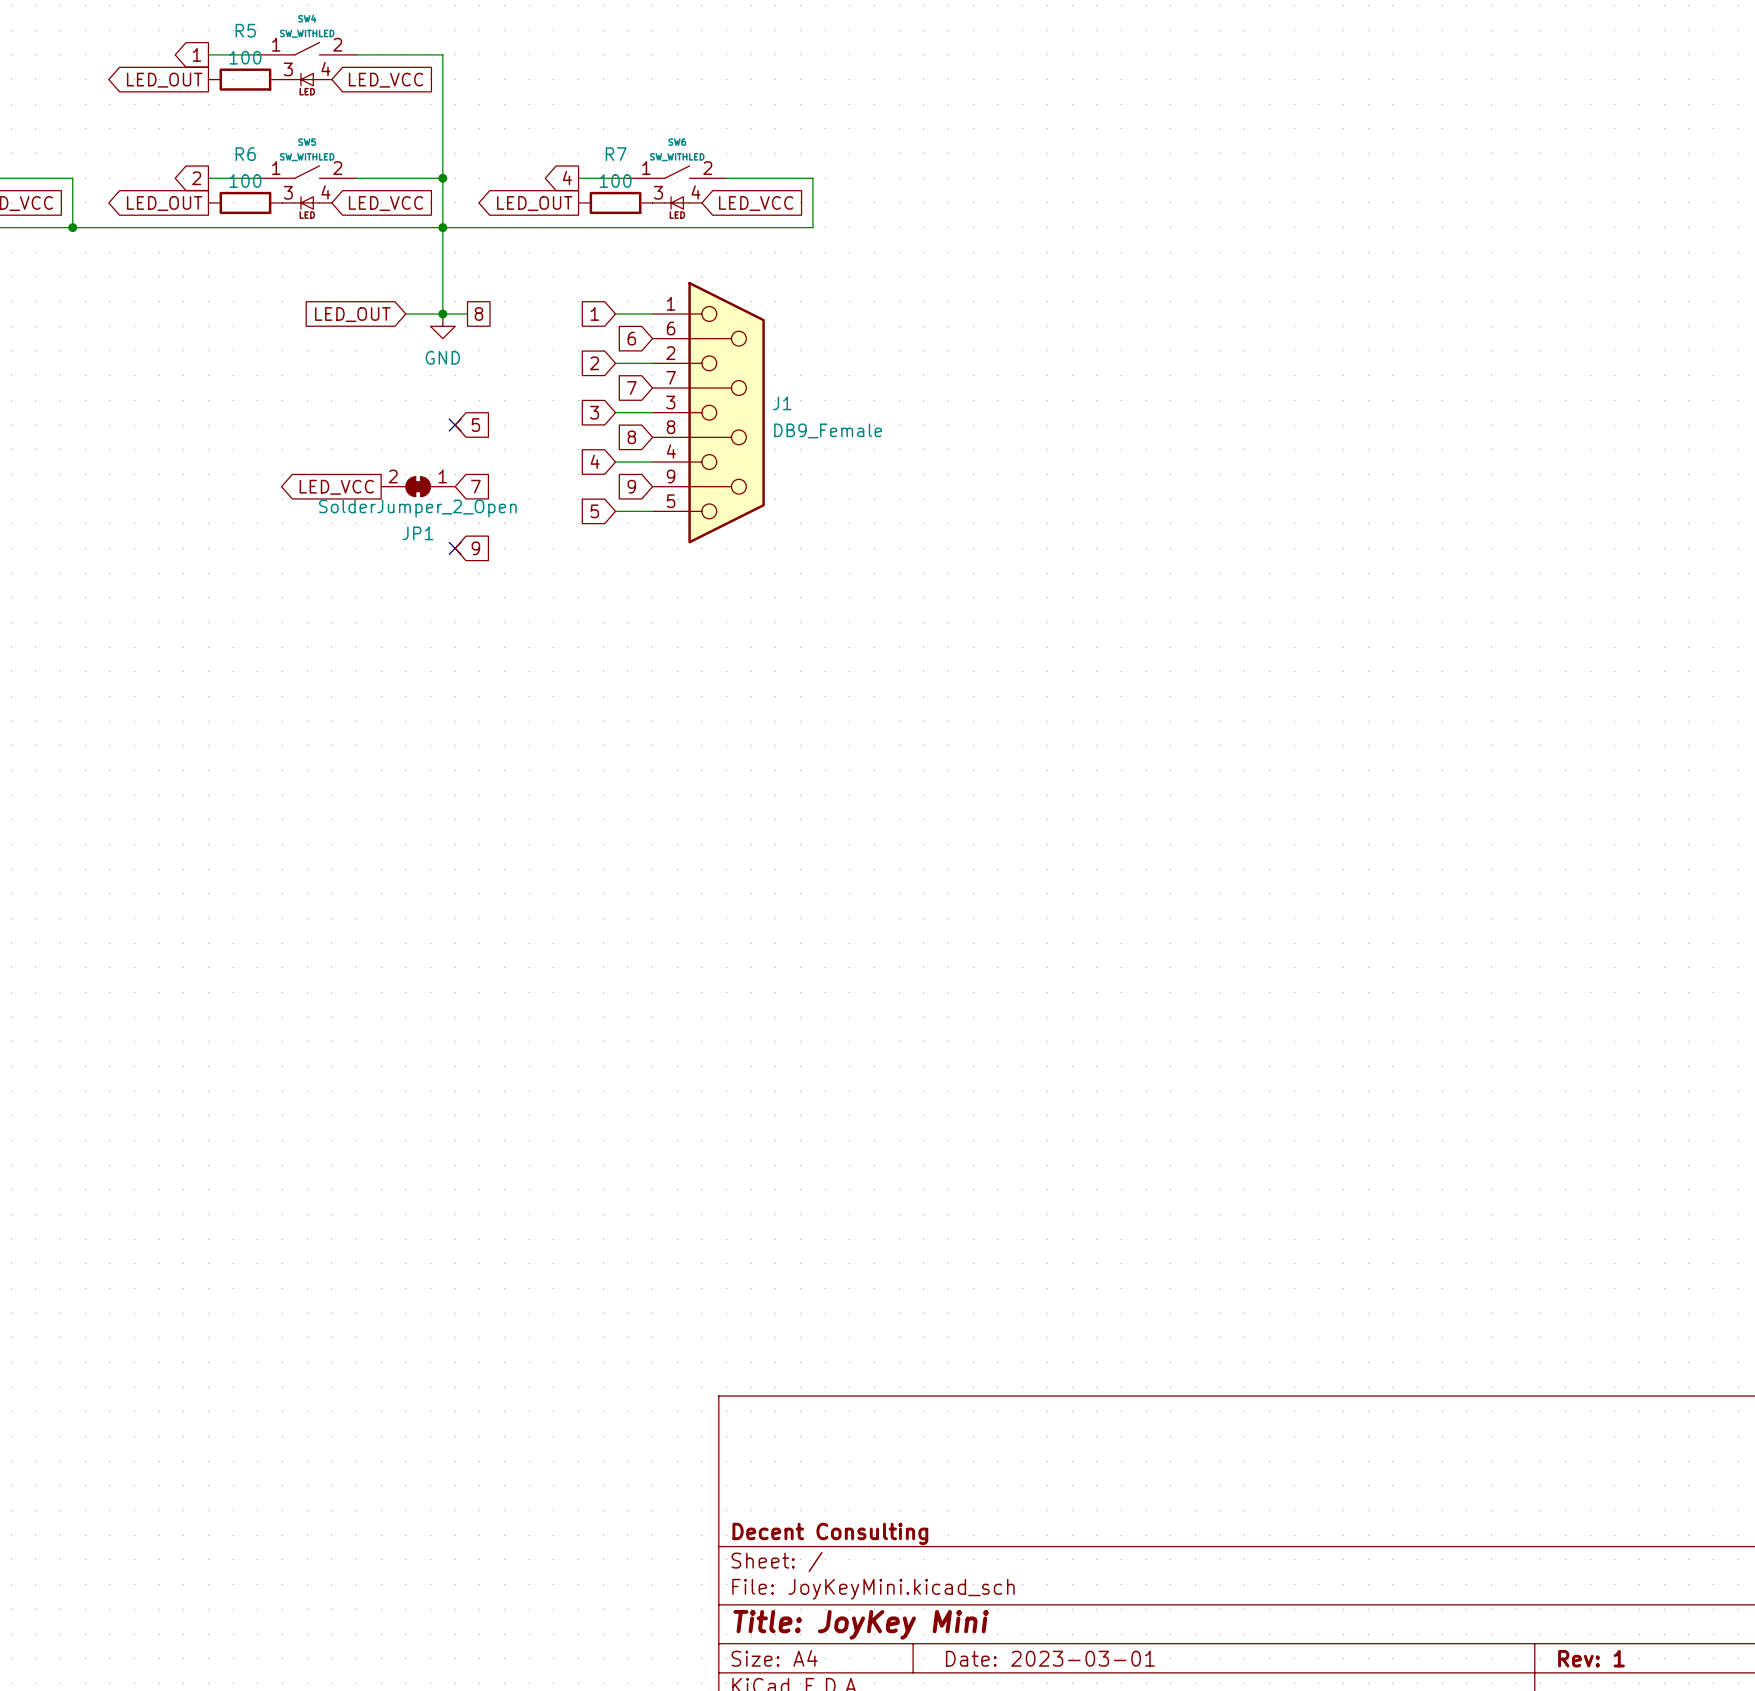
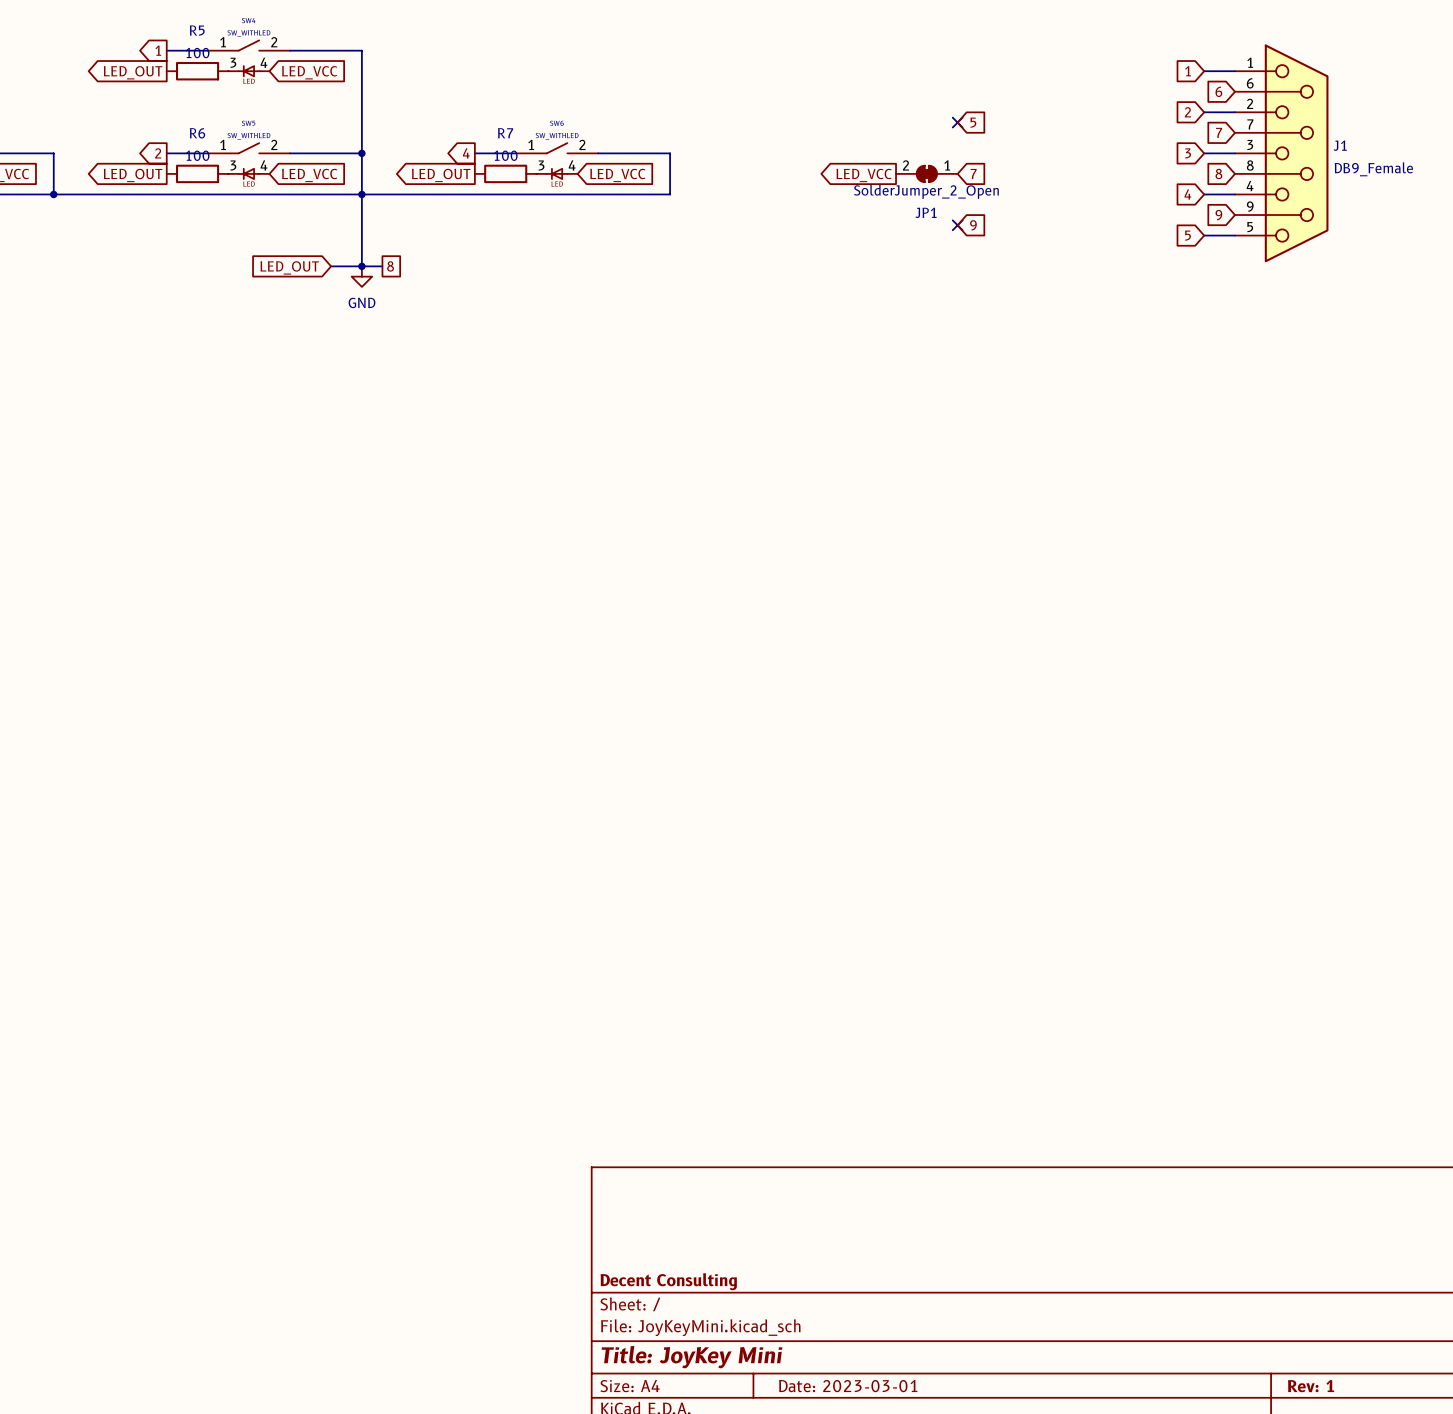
global label: none -> 1 (1188, 71)
wire: none -> (1204, 71) (1235, 71)
global label: none -> 6 (1218, 91)
global label: none -> 2 (1187, 112)
wire: none -> (1204, 112) (1235, 112)
no-connect mark: none -> (957, 122)
global label: none -> 5 (973, 122)
global label: none -> 7 (1219, 132)
global label: none -> 3 (1188, 153)
wire: none -> (1204, 153) (1235, 153)
global label: none -> 7 (973, 173)
global label: none -> 8 (1218, 173)
global label: none -> LED_VCC (864, 175)
global label: none -> 4 (1187, 194)
wire: none -> (1204, 194) (1235, 194)
global label: none -> 9 (1218, 215)
no-connect mark: none -> (957, 225)
global label: none -> 9 (973, 225)
global label: none -> 5 (1188, 235)
wire: none -> (1204, 235) (1235, 235)
global label: 1 (594, 313) -> none
wire: (615, 313) (652, 313) -> none
global label: 6 (631, 338) -> none
global label: 2 (594, 363) -> none
wire: (615, 363) (652, 363) -> none
global label: 7 (631, 388) -> none
global label: 3 (594, 412) -> none
wire: (615, 412) (652, 412) -> none
J1 position: (708, 412) -> (1281, 153)
no-connect mark: (455, 425) -> none
global label: 5 (475, 425) -> none
global label: 8 (631, 437) -> none
global label: 4 (595, 461) -> none
wire: (615, 462) (652, 462) -> none
JP1 position: (418, 486) -> (926, 173)
global label: 7 (475, 486) -> none
global label: 9 (631, 486) -> none
global label: LED_VCC (336, 487) -> none
global label: 5 (594, 511) -> none
wire: (615, 511) (652, 511) -> none
no-connect mark: (455, 548) -> none
global label: 9 (475, 548) -> none

